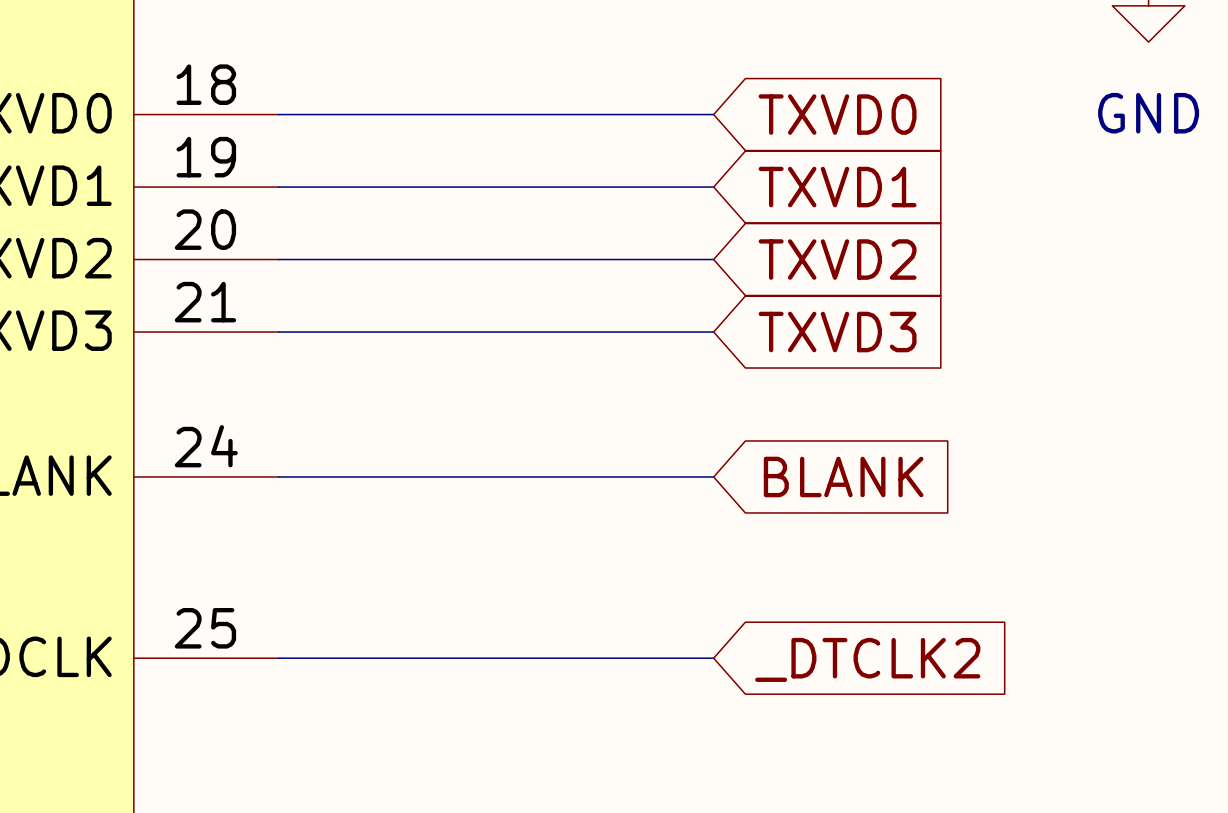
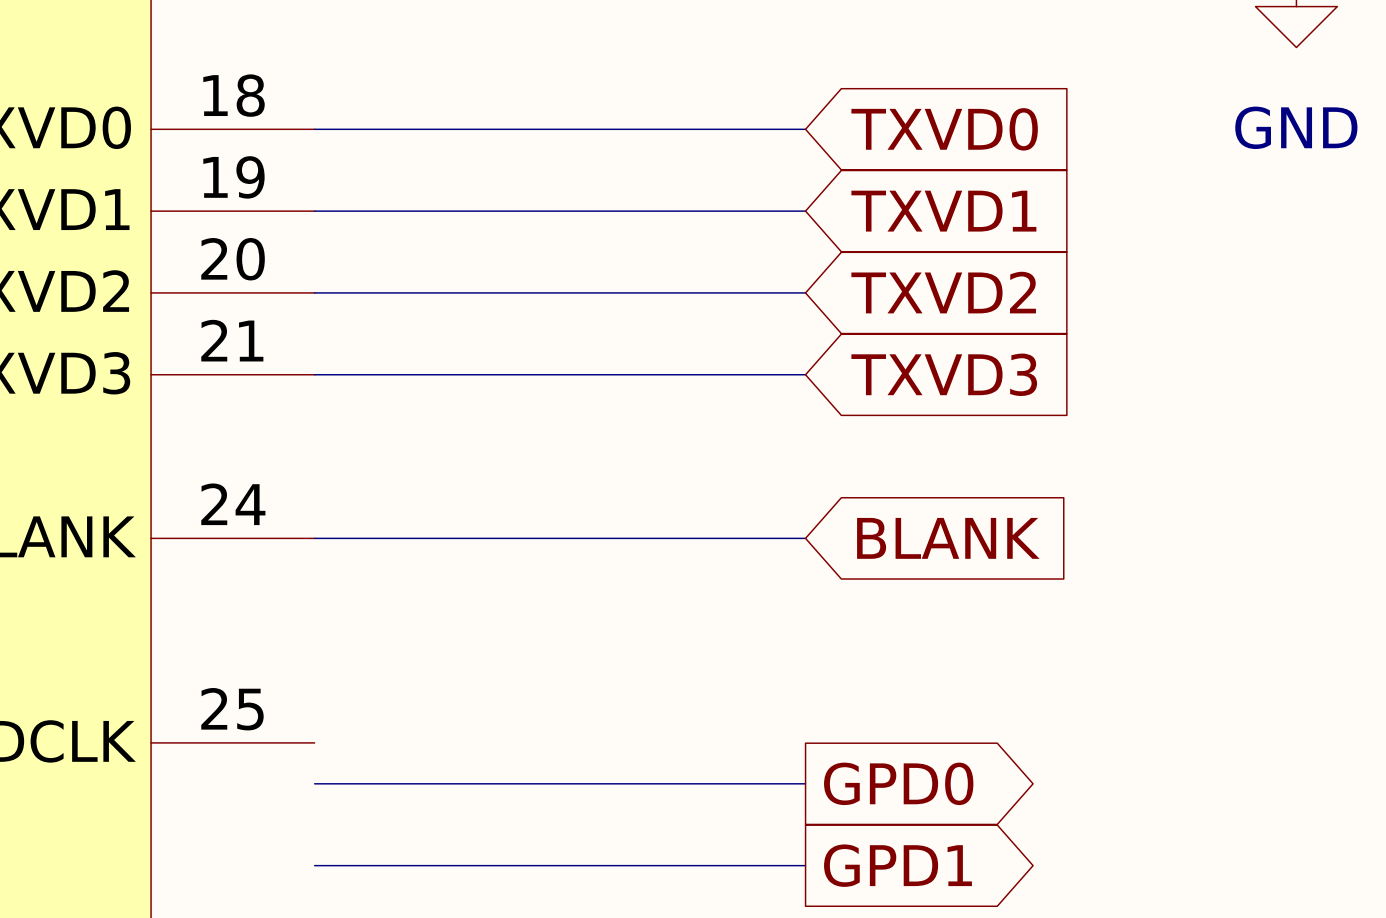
wire: (278, 658) (713, 658) -> (314, 783) (805, 783)
global label: _DTCLK2 (867, 659) -> none
global label: none -> GPD0 (898, 783)
wire: none -> (314, 865) (805, 865)
global label: none -> GPD1 (897, 865)

